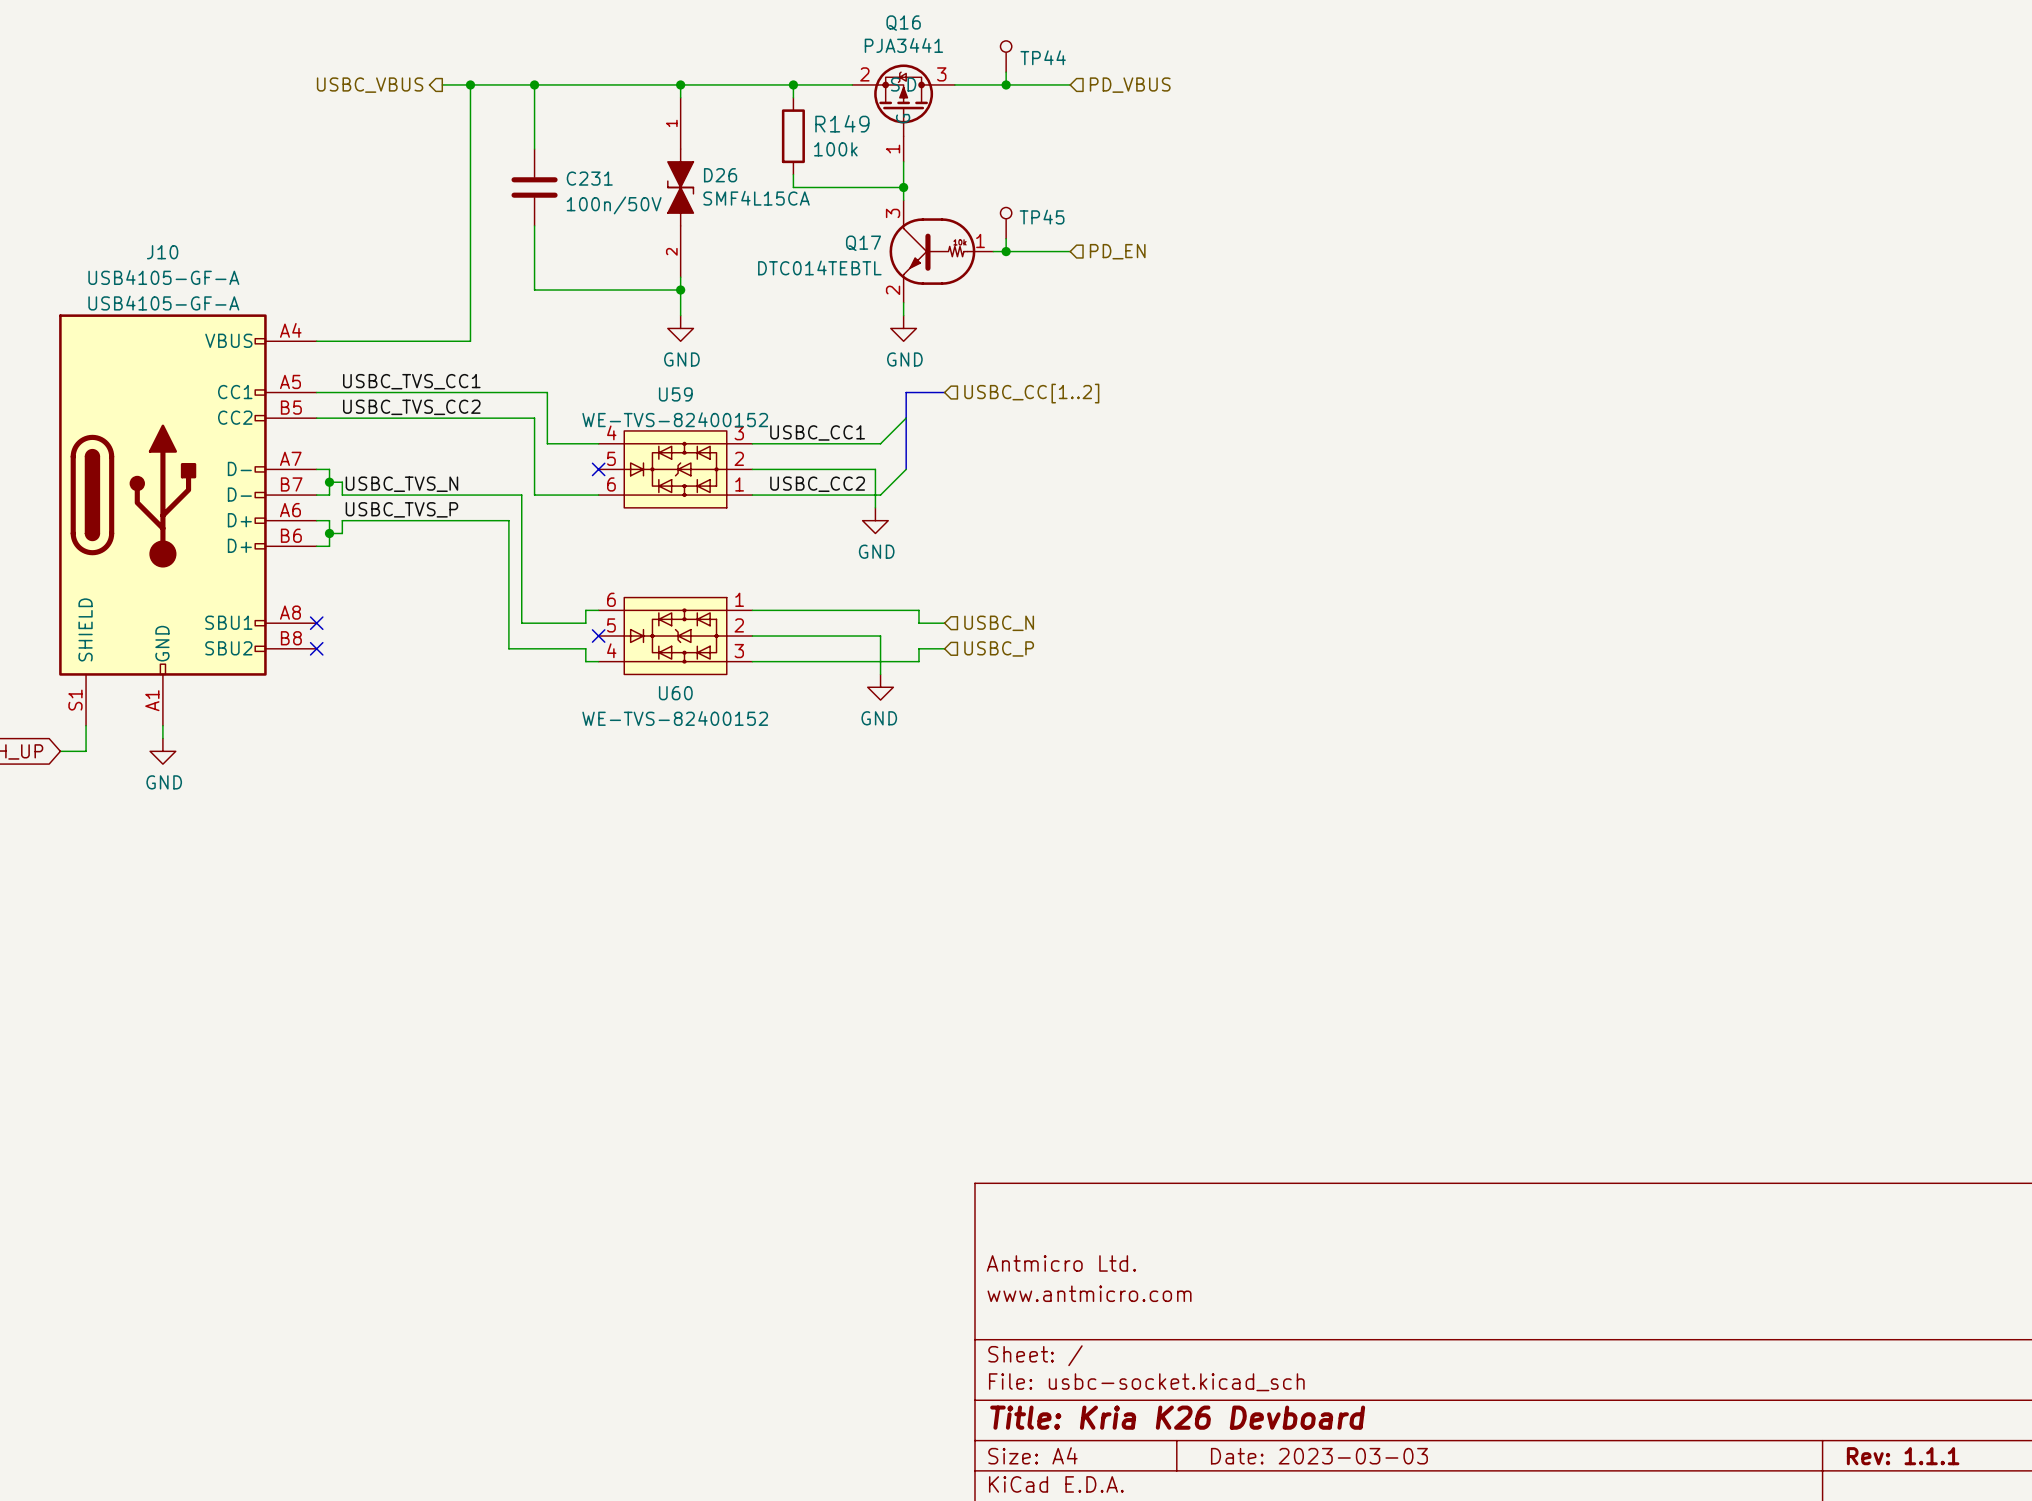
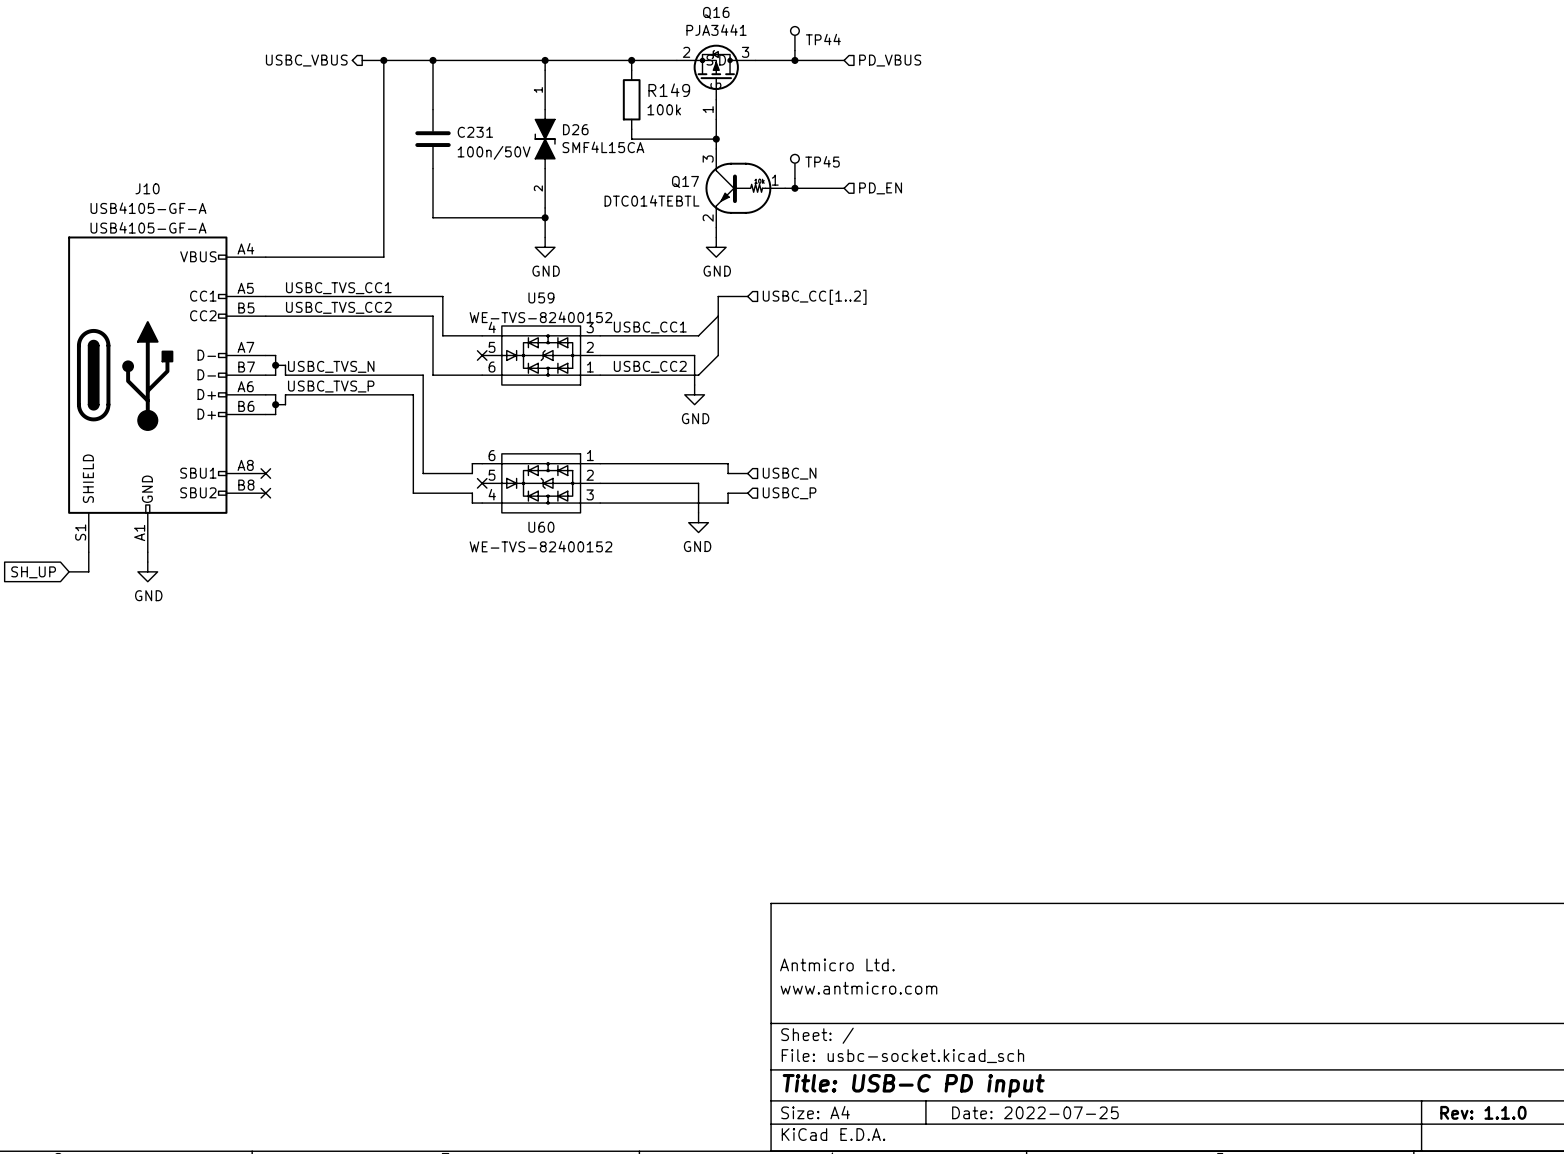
title block: Title: Kria K26 Devboard (1177, 1417) -> Title: USB-C PD input (913, 1085)
title block: Date: 2023-03-03 (1319, 1456) -> Date: 2022-07-25 (1035, 1112)
title block: Rev: 1.1.1 (1903, 1456) -> Rev: 1.1.0 (1483, 1112)

